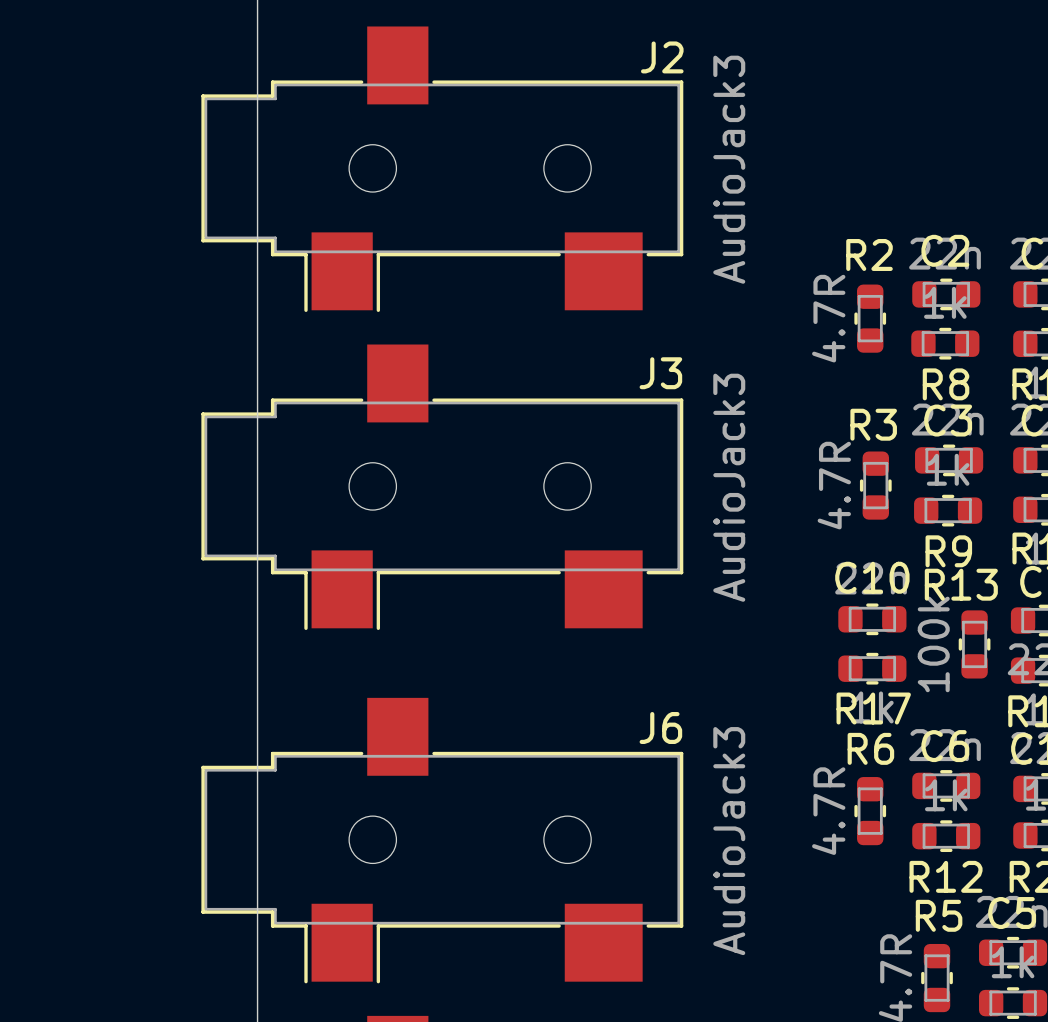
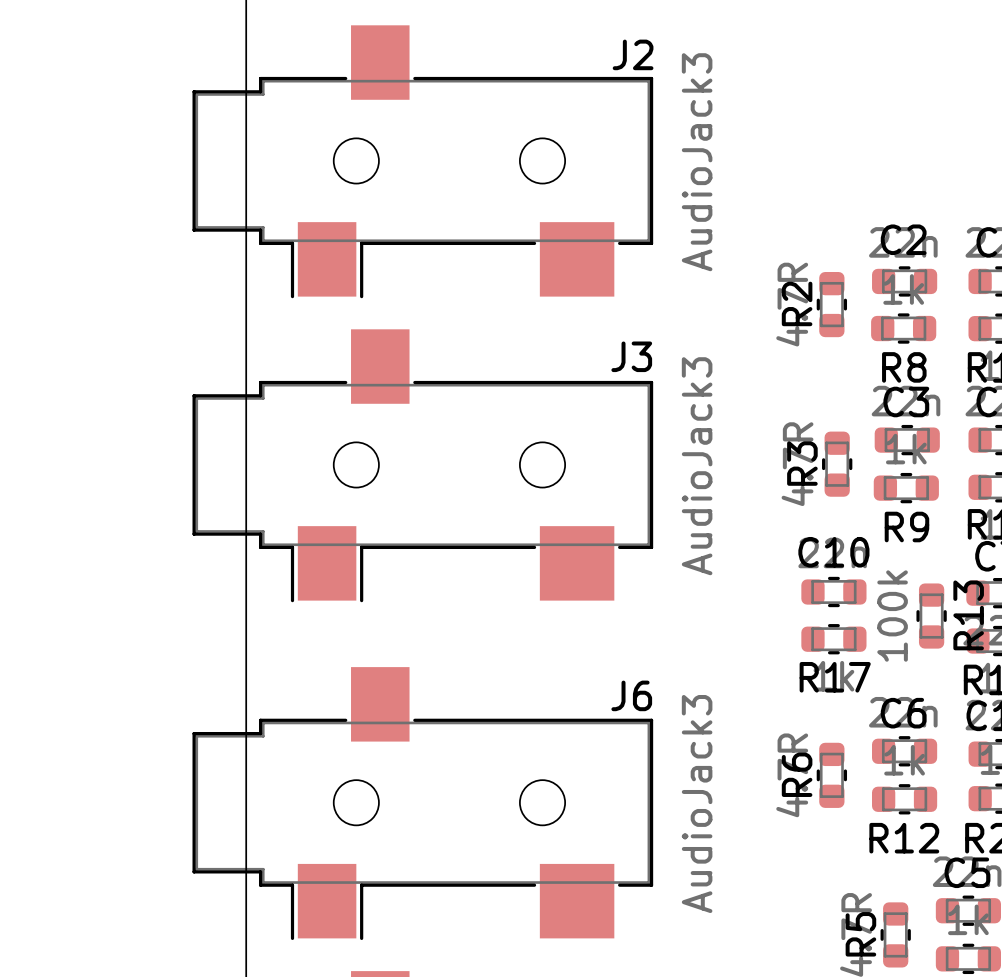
R2 name rotation: 0° (869, 254) -> 90° counterclockwise (797, 303)
R2 name position: R2 (869, 254) -> R2 (797, 303)
R3 name rotation: 0° (873, 424) -> 90° counterclockwise (802, 463)
R13 name rotation: 0° (961, 584) -> 90° counterclockwise (968, 615)
R6 name rotation: 0° (870, 748) -> 90° counterclockwise (797, 774)
R6 name position: R6 (870, 748) -> R6 (797, 774)
R5 name rotation: 0° (939, 915) -> 90° counterclockwise (860, 934)
R5 name position: R5 (939, 915) -> R5 (860, 934)

